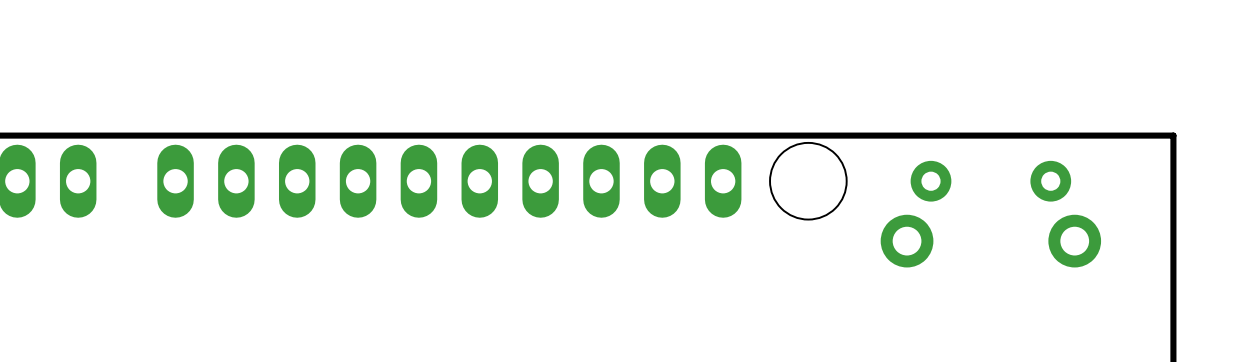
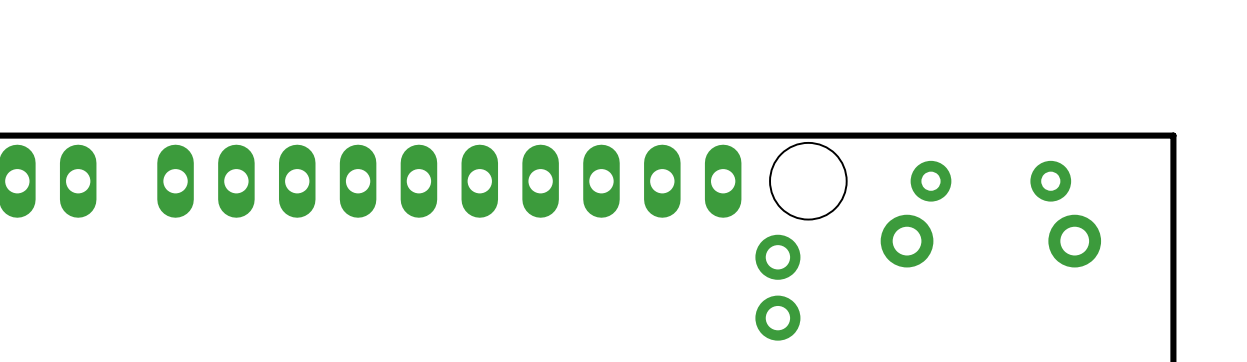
part: none -> (777, 287)

